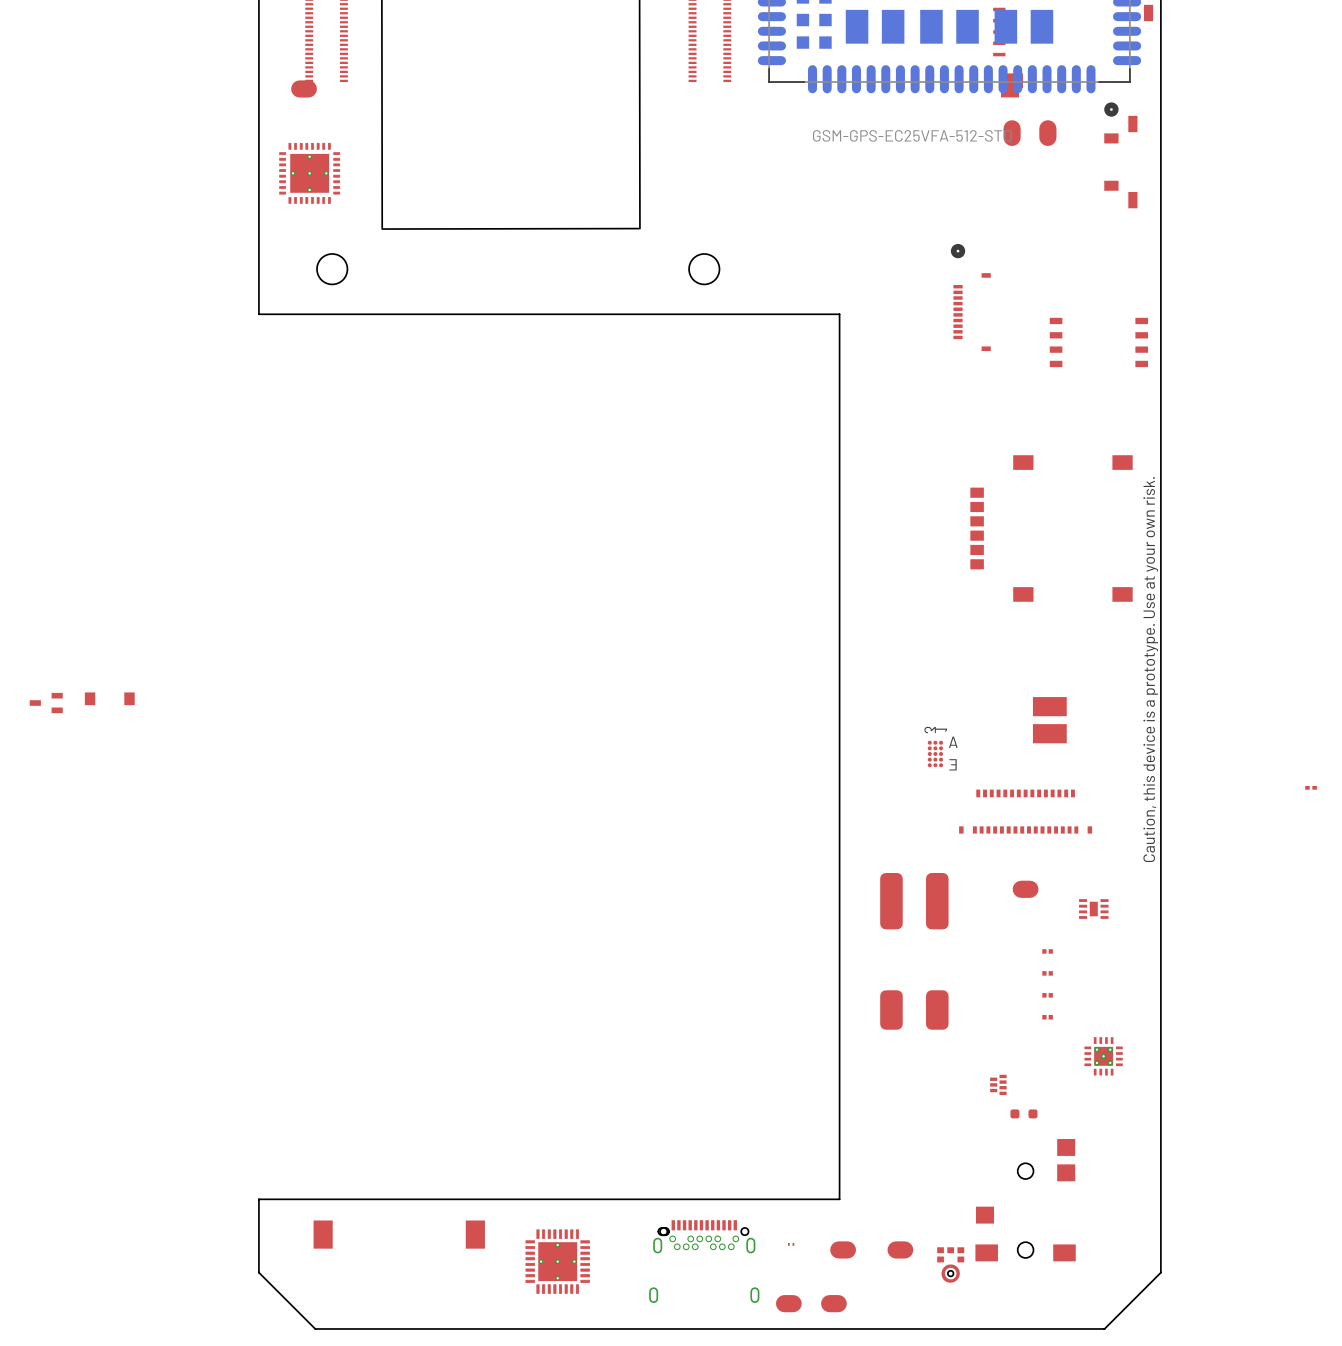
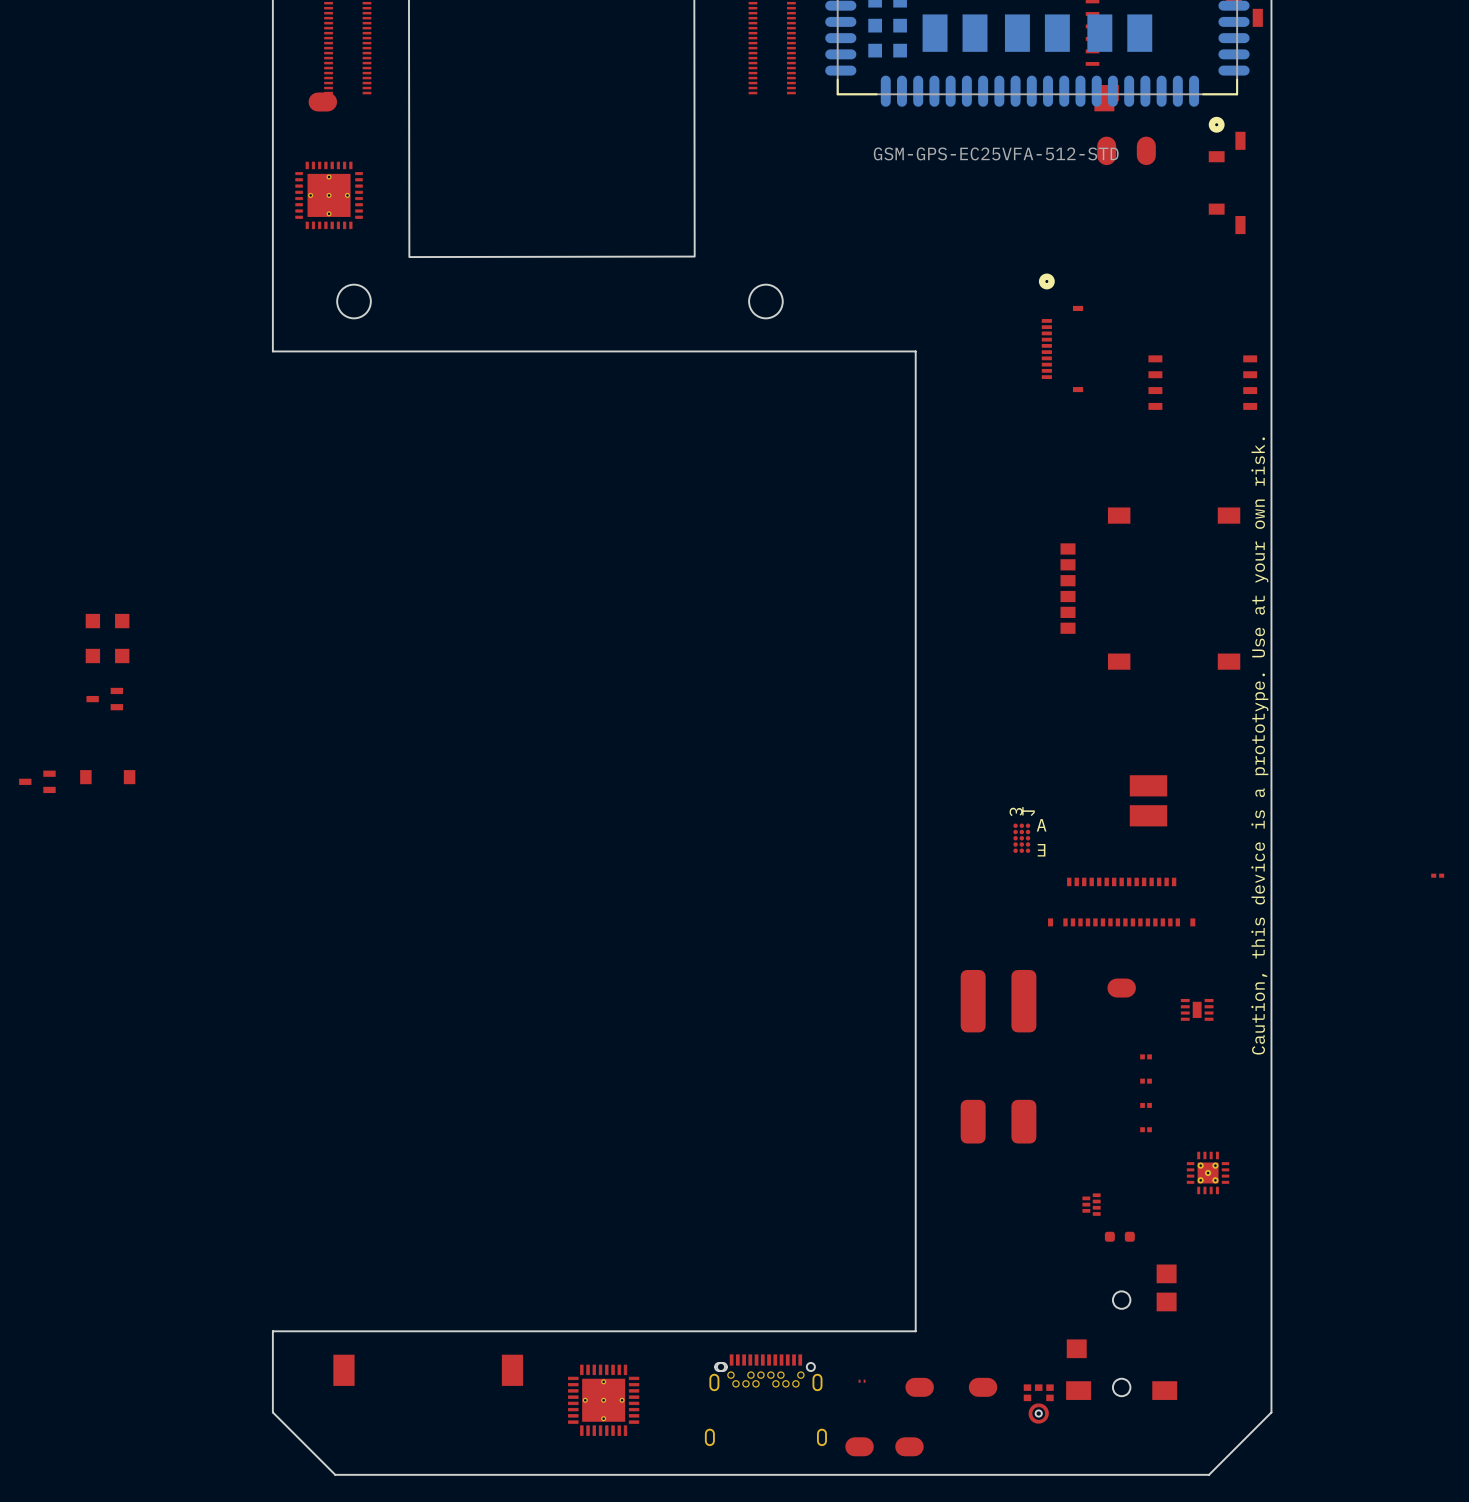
part: none -> (107, 621)
part: none -> (107, 656)
part: none -> (104, 699)

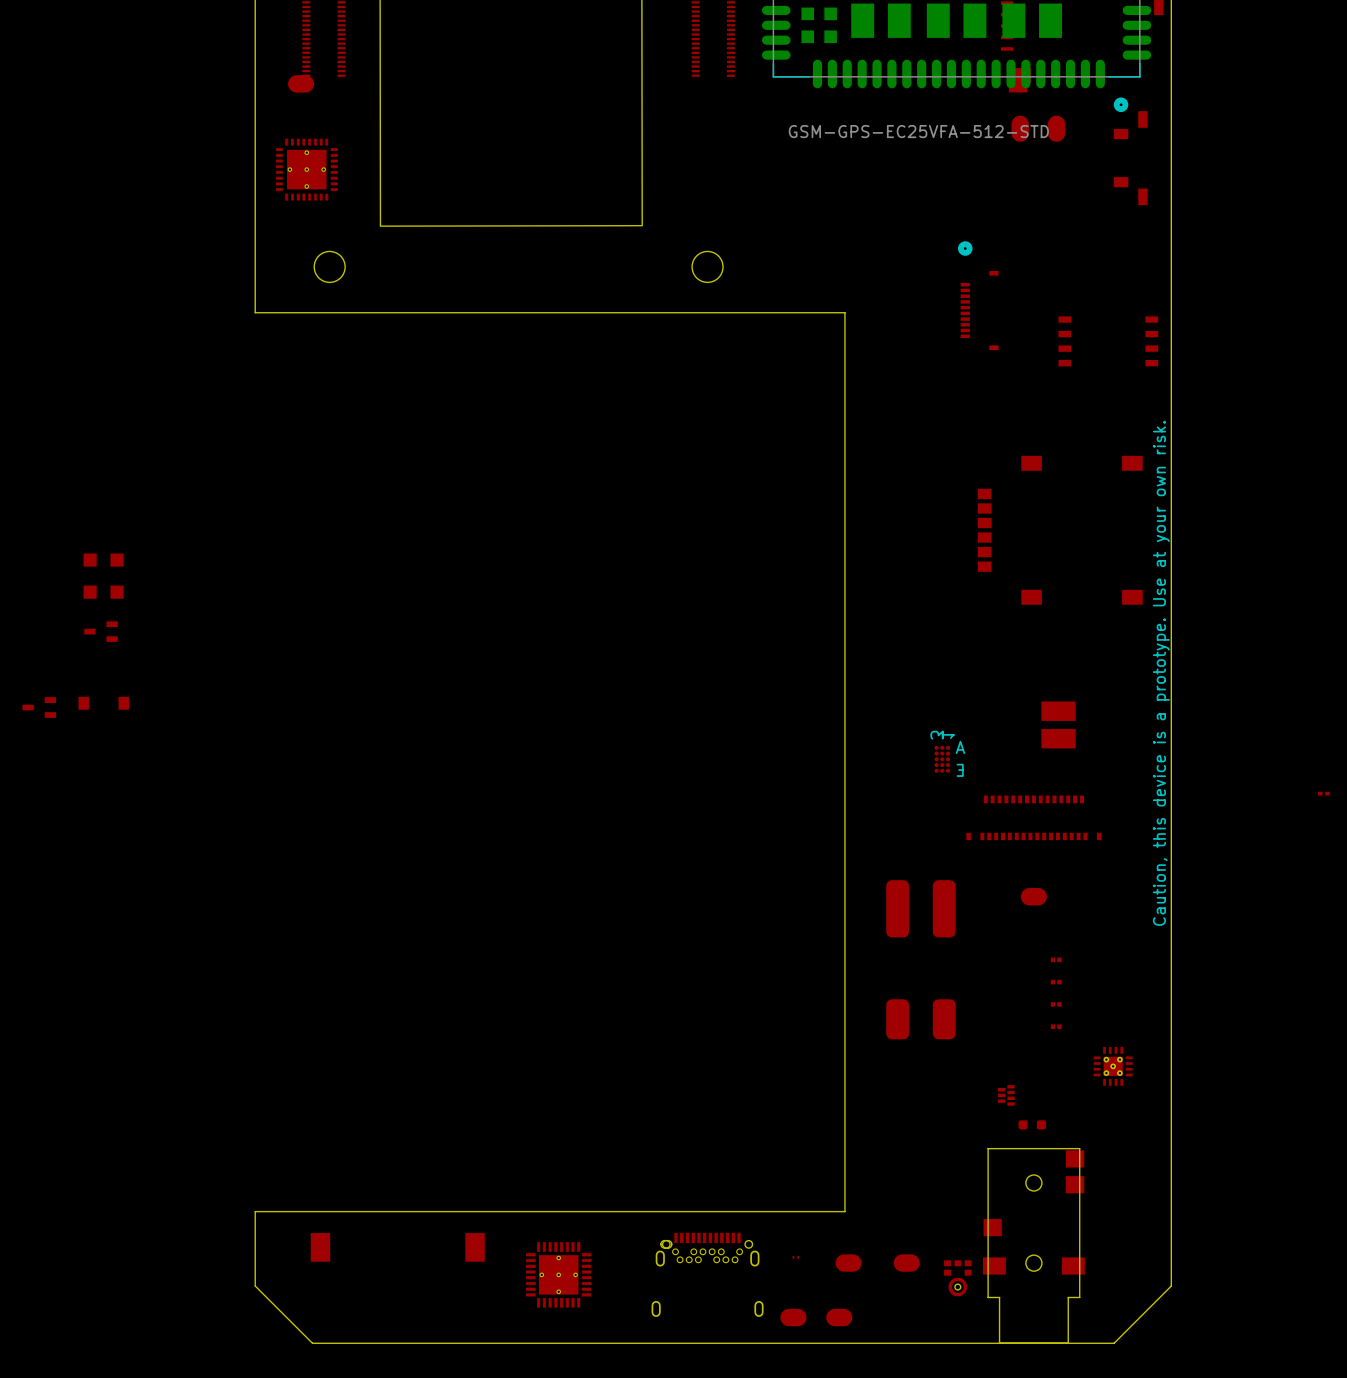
part: (1197, 1009) -> none
board edge: none -> (1079, 1148) (1079, 1297) (1068, 1297) (1068, 1343) (999, 1343) (999, 1297) (988, 1297) (988, 1148) (1079, 1148)

